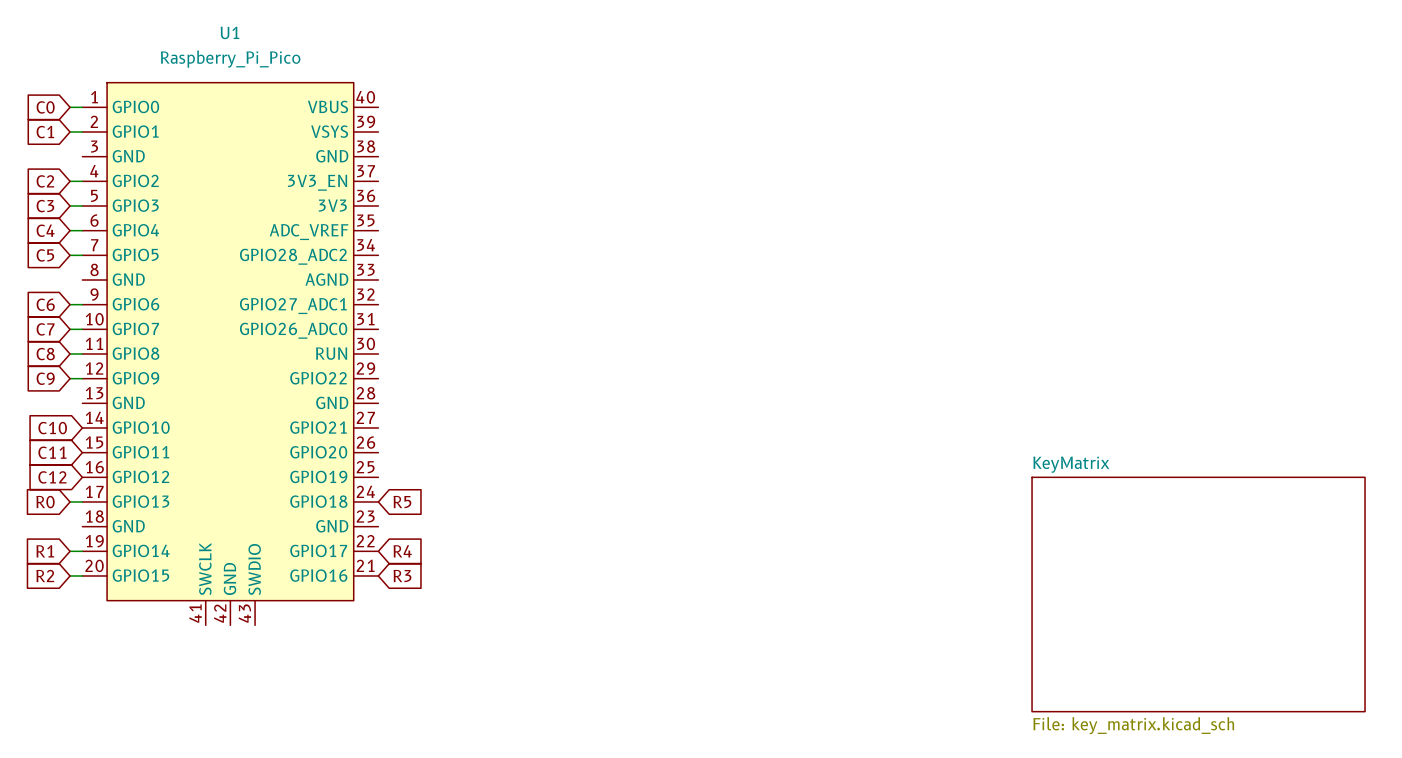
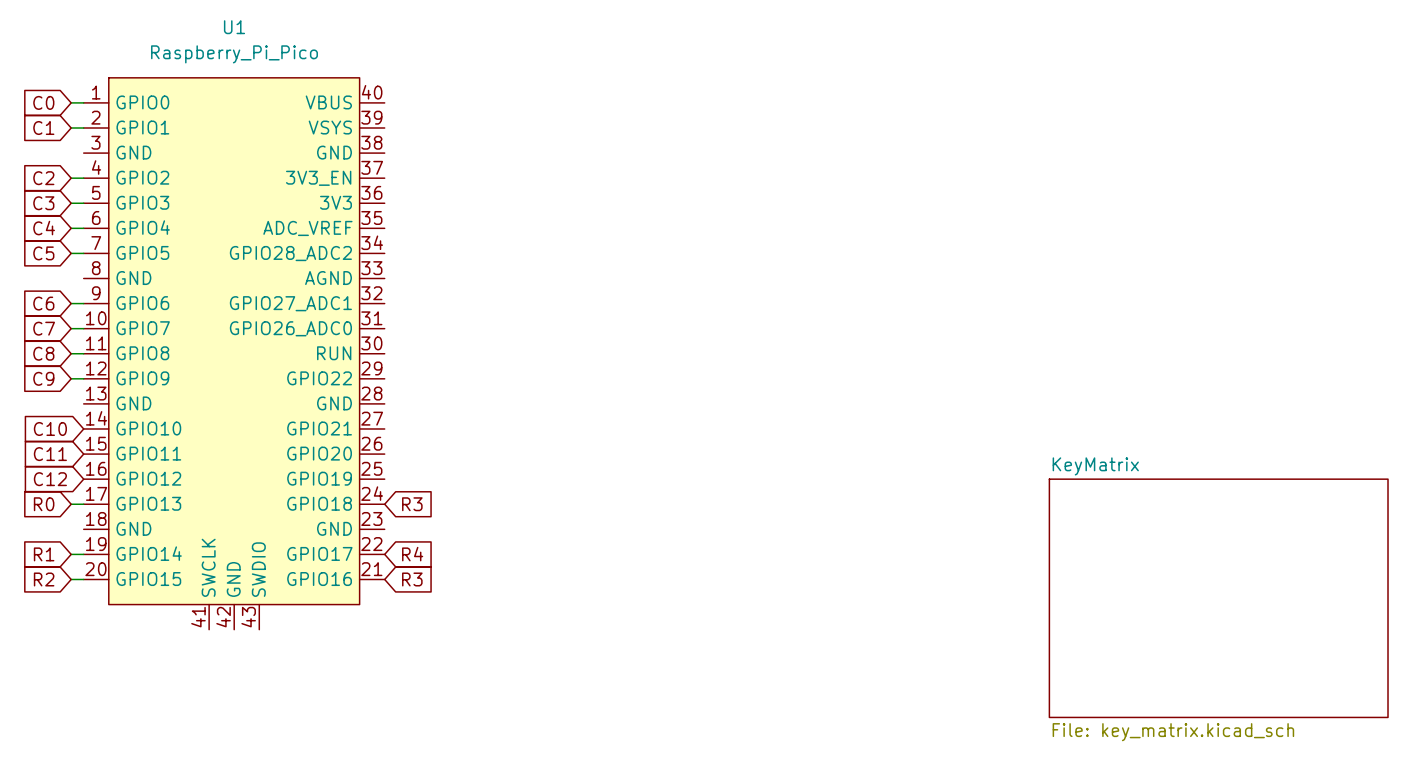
global label: R5 (402, 502) -> R3 (412, 504)

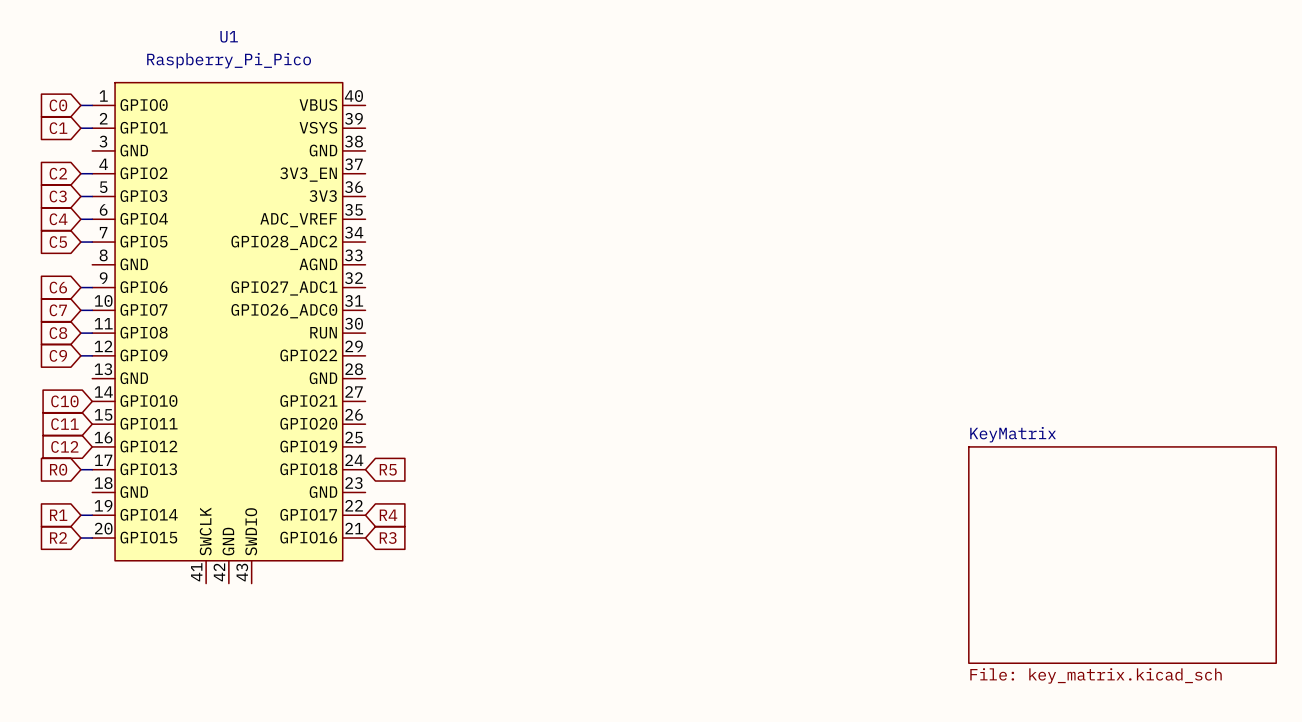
global label: R3 (412, 504) -> R5 (388, 469)

